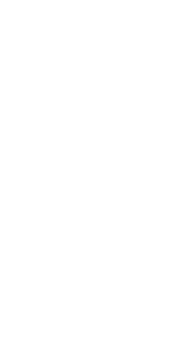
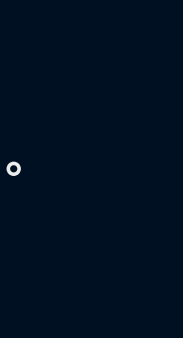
via: none -> (13, 168)

